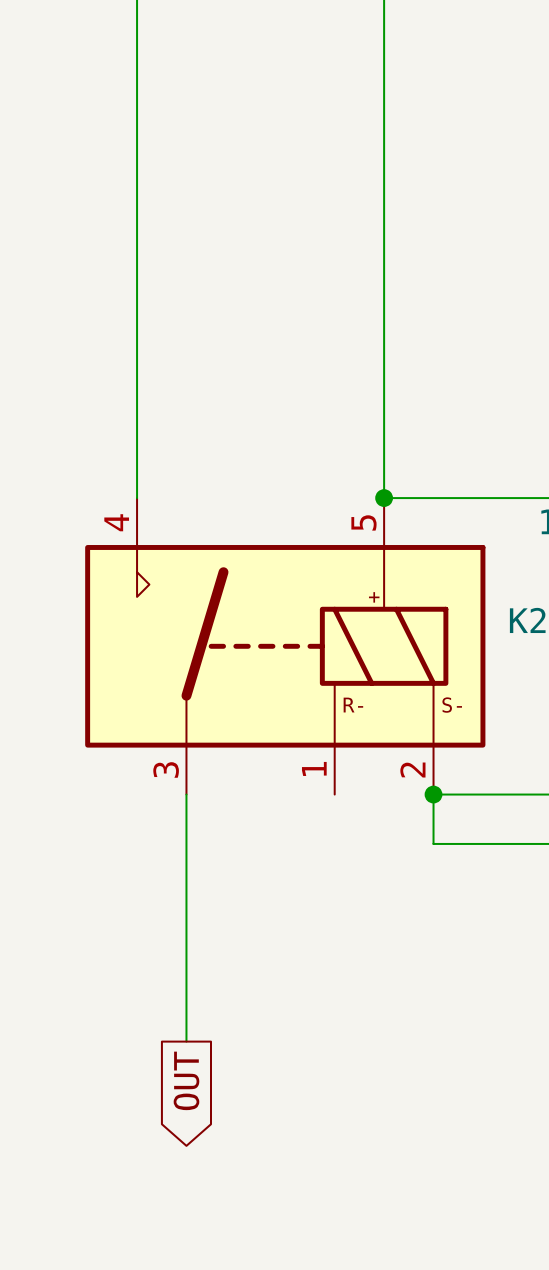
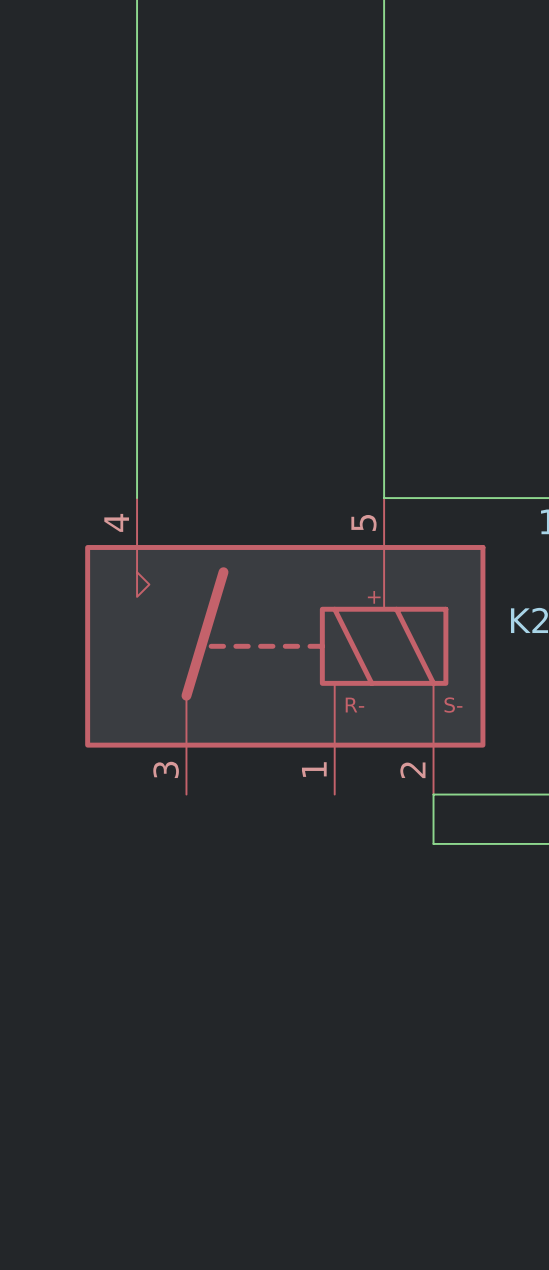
junction: (384, 498) -> none
wire: (186, 794) (186, 1041) -> none
junction: (433, 794) -> none
global label: OUT (186, 1080) -> none

